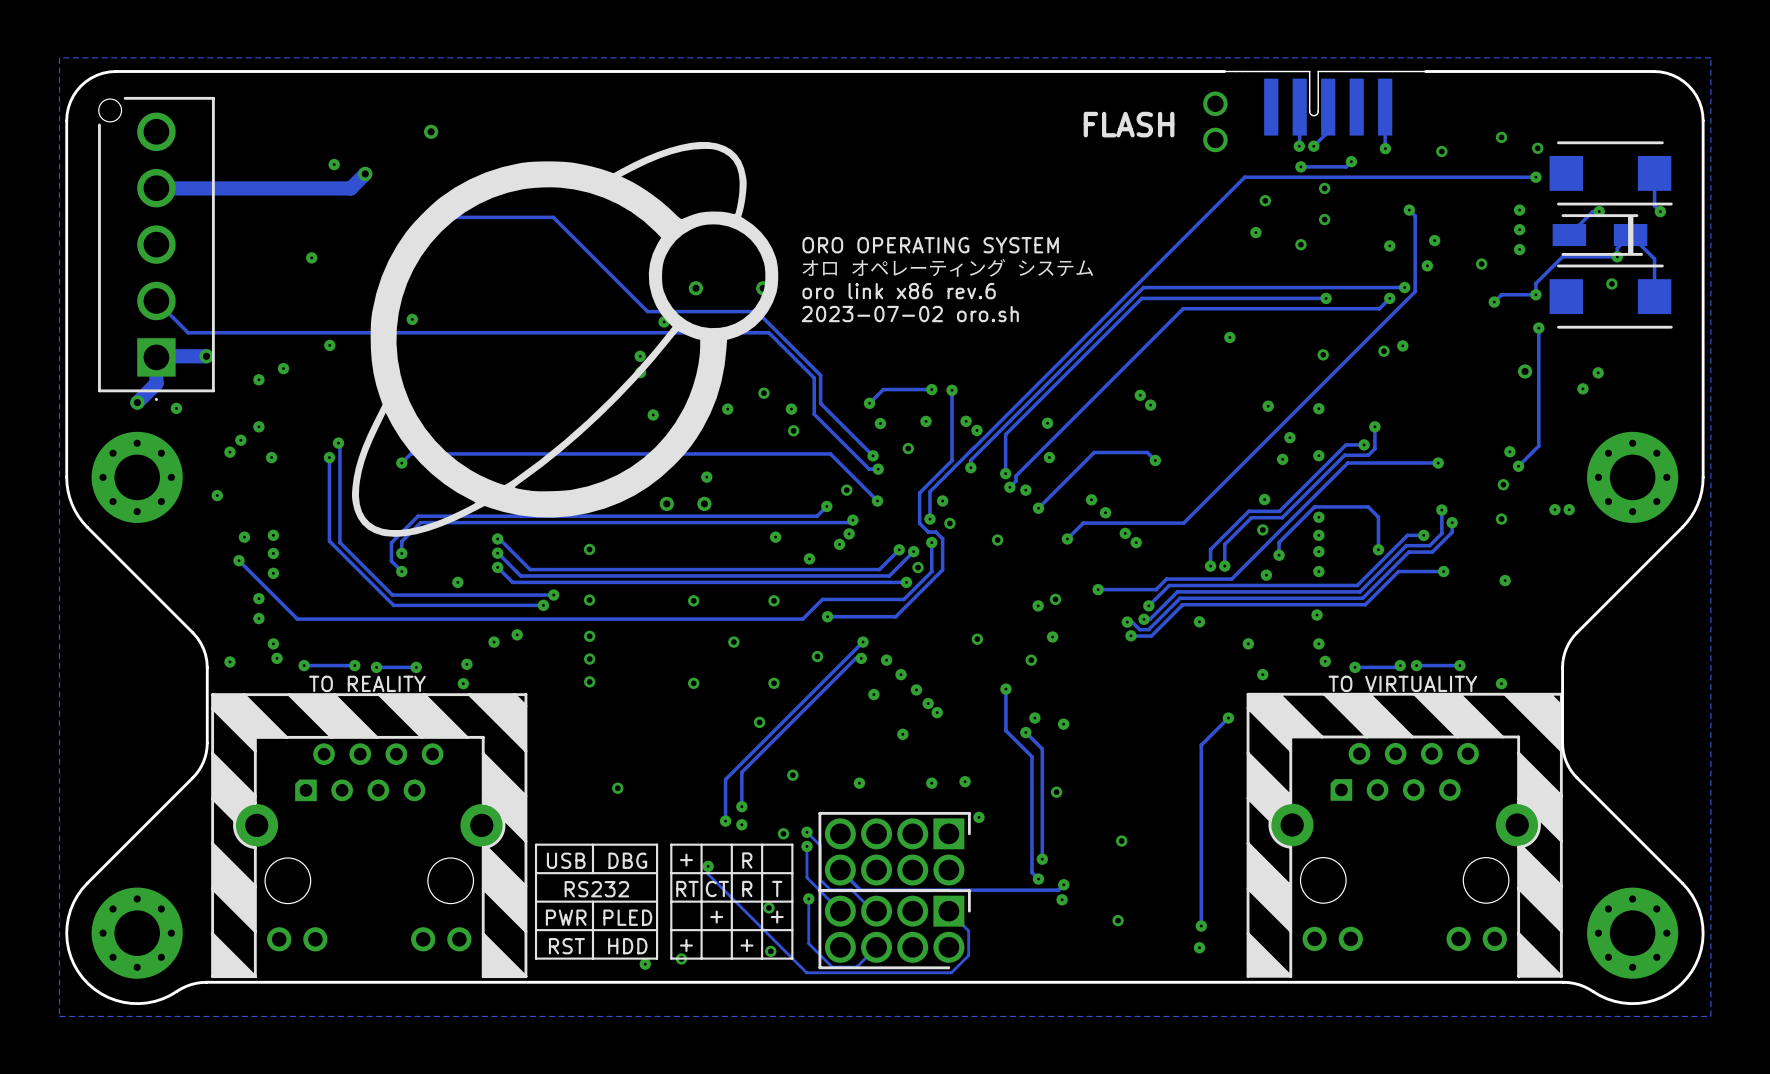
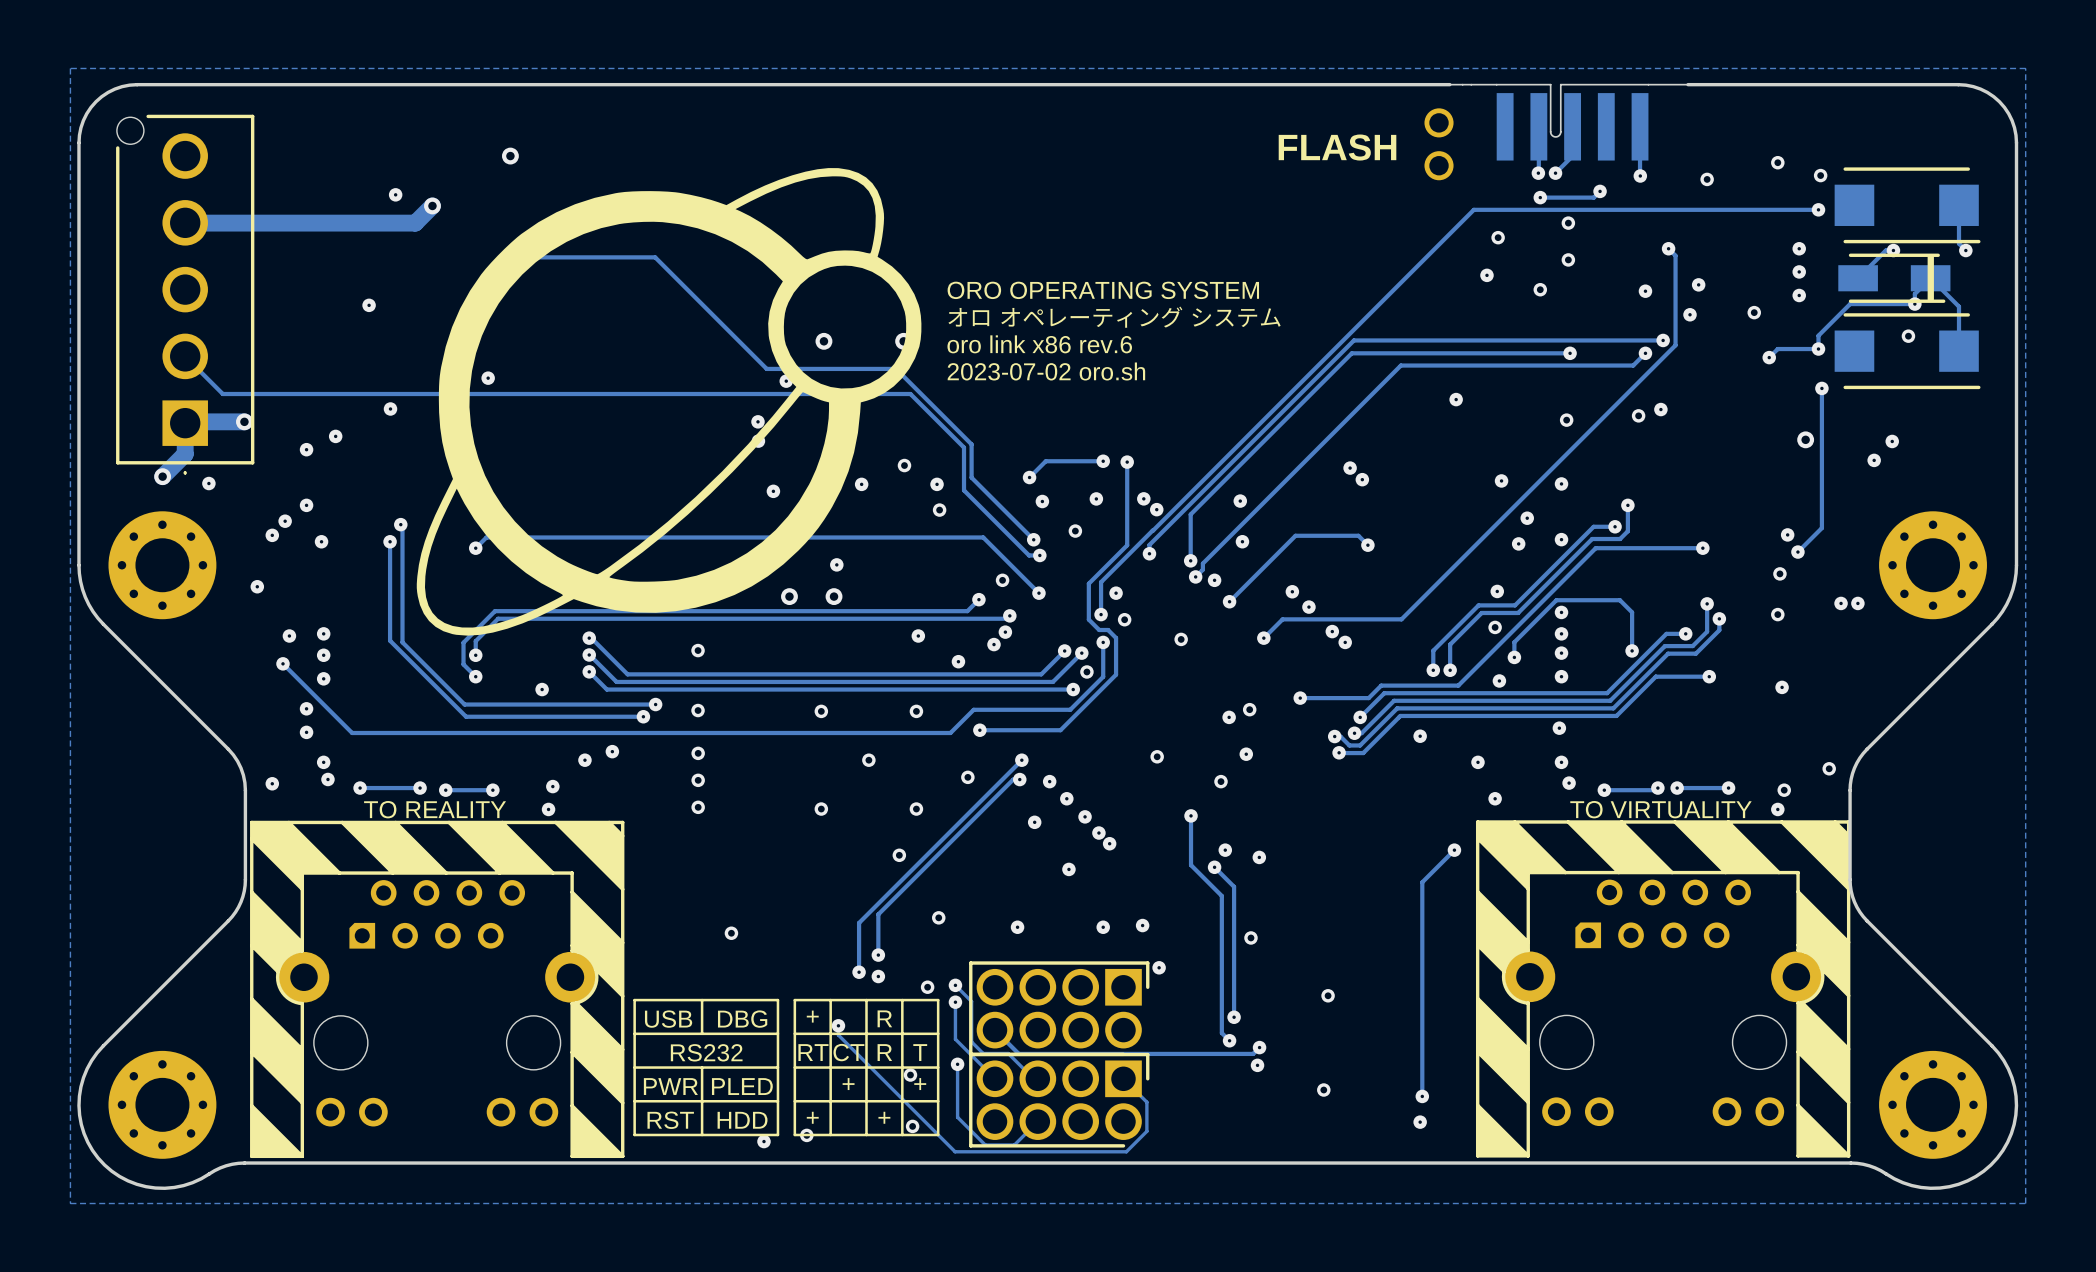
via: none -> (1829, 768)
via: none -> (1784, 790)

